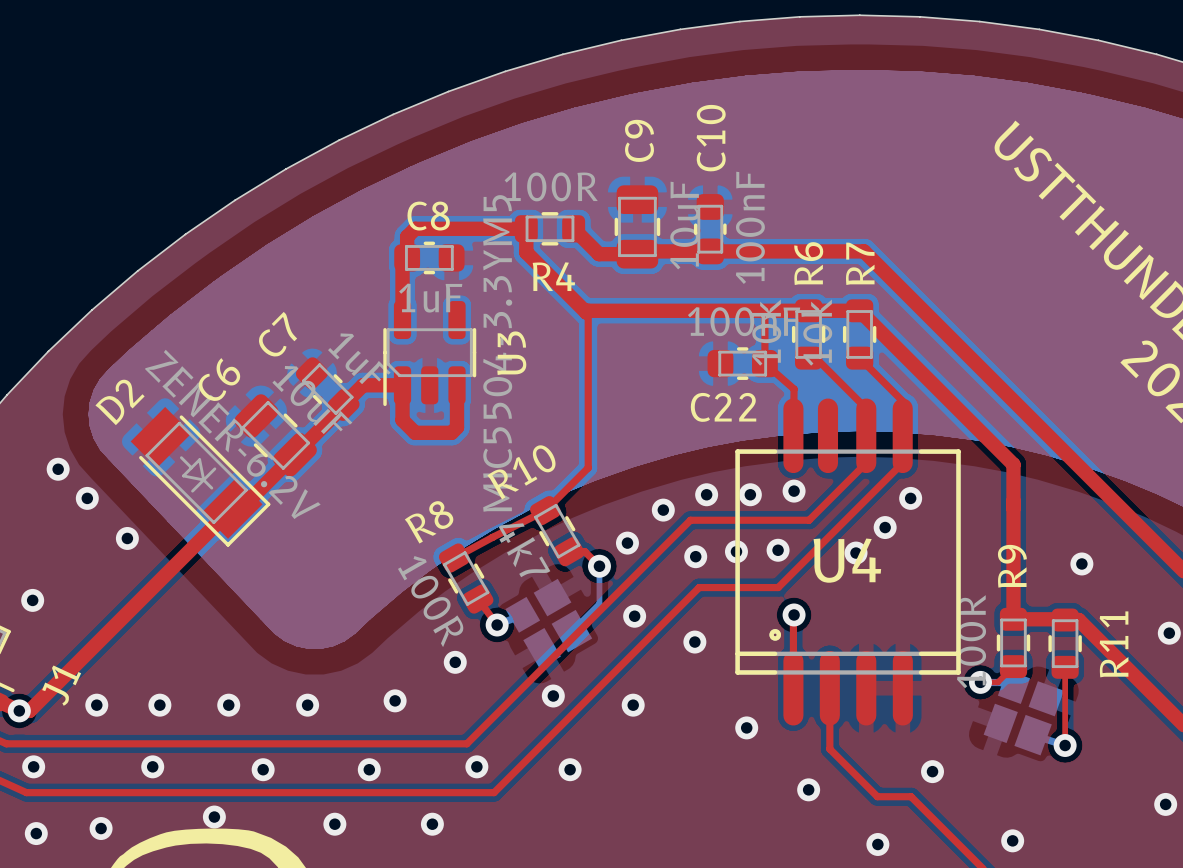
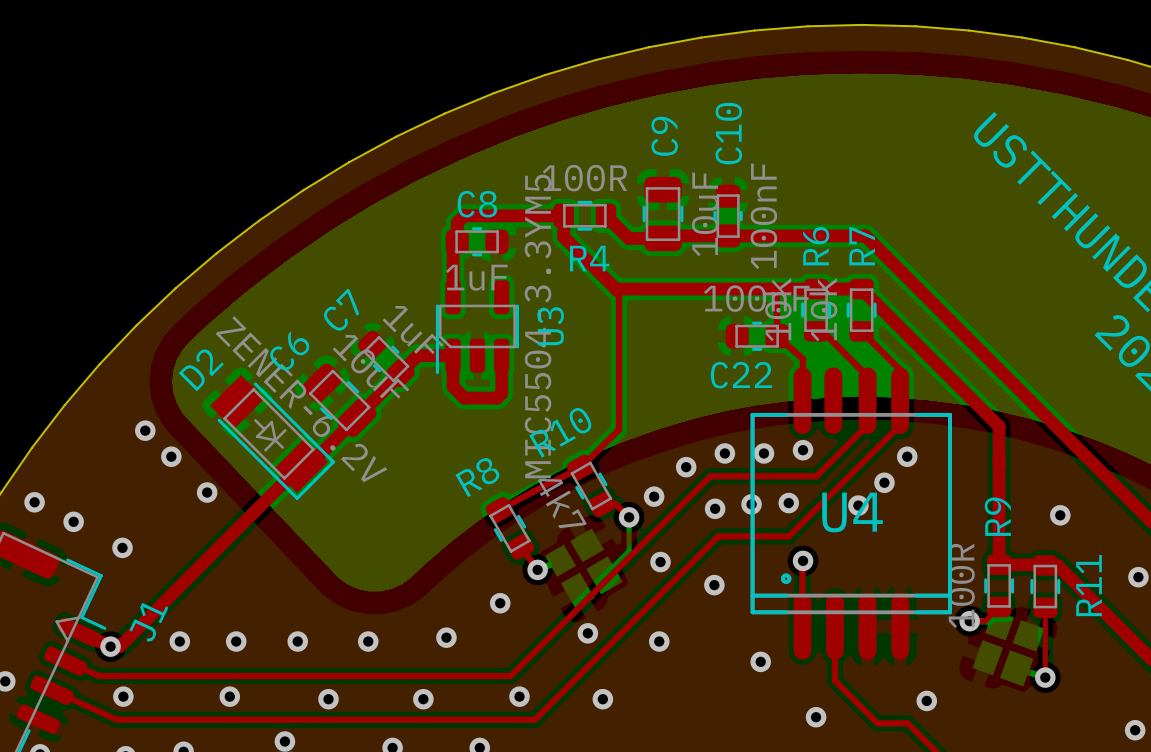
R8 value: 100R (430, 601) -> none

